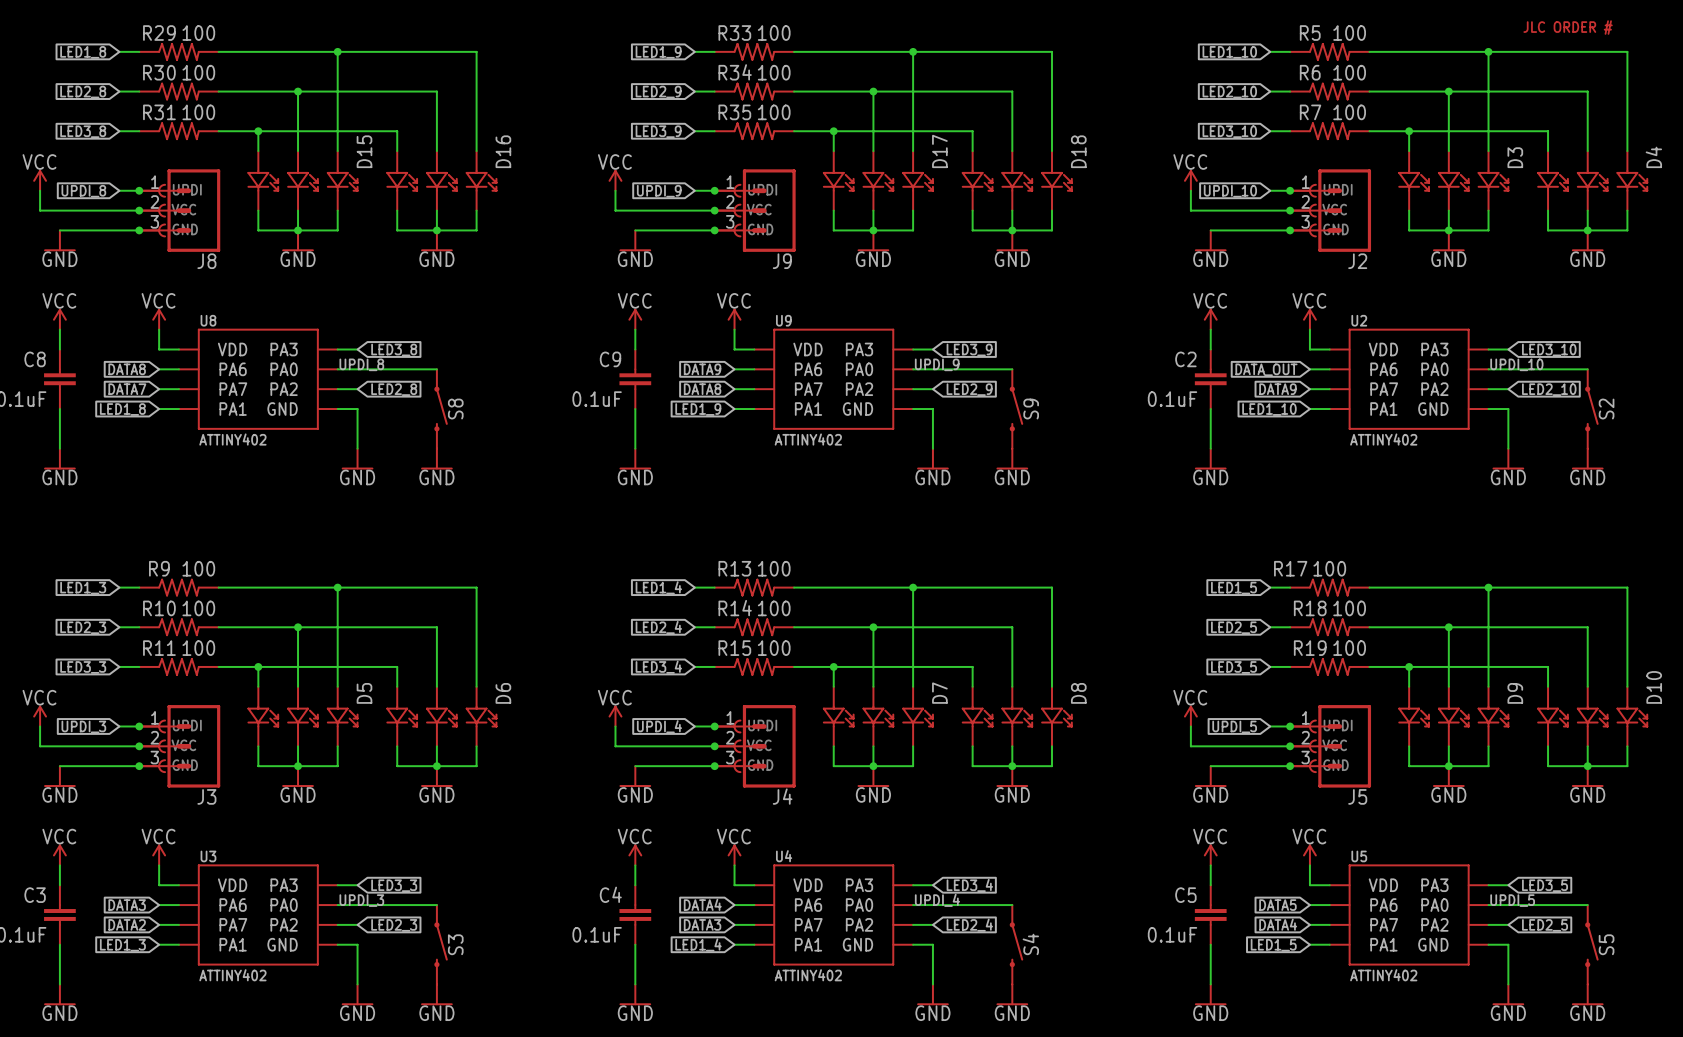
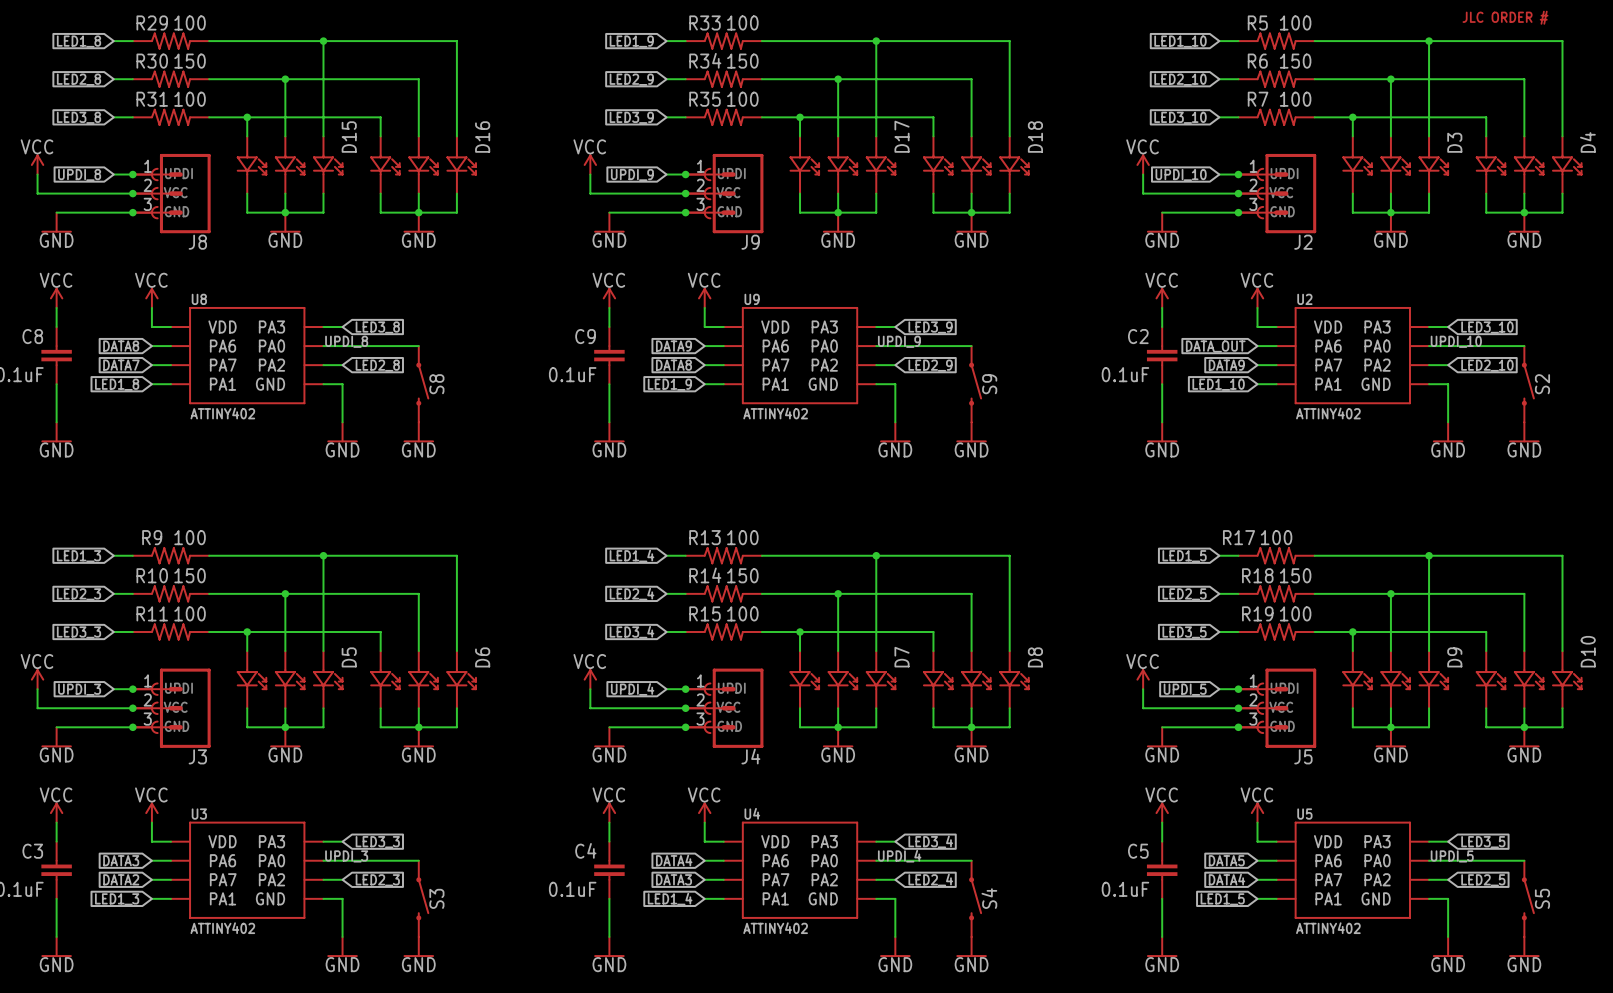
R30 value: 100 (198, 72) -> 150 (190, 61)
R34 value: 100 (774, 72) -> 150 (742, 61)
R6 value: 100 (1349, 72) -> 150 (1295, 61)
R10 value: 100 (198, 608) -> 150 (190, 575)
R14 value: 100 (774, 608) -> 150 (742, 575)
R18 value: 100 (1349, 608) -> 150 (1295, 575)

